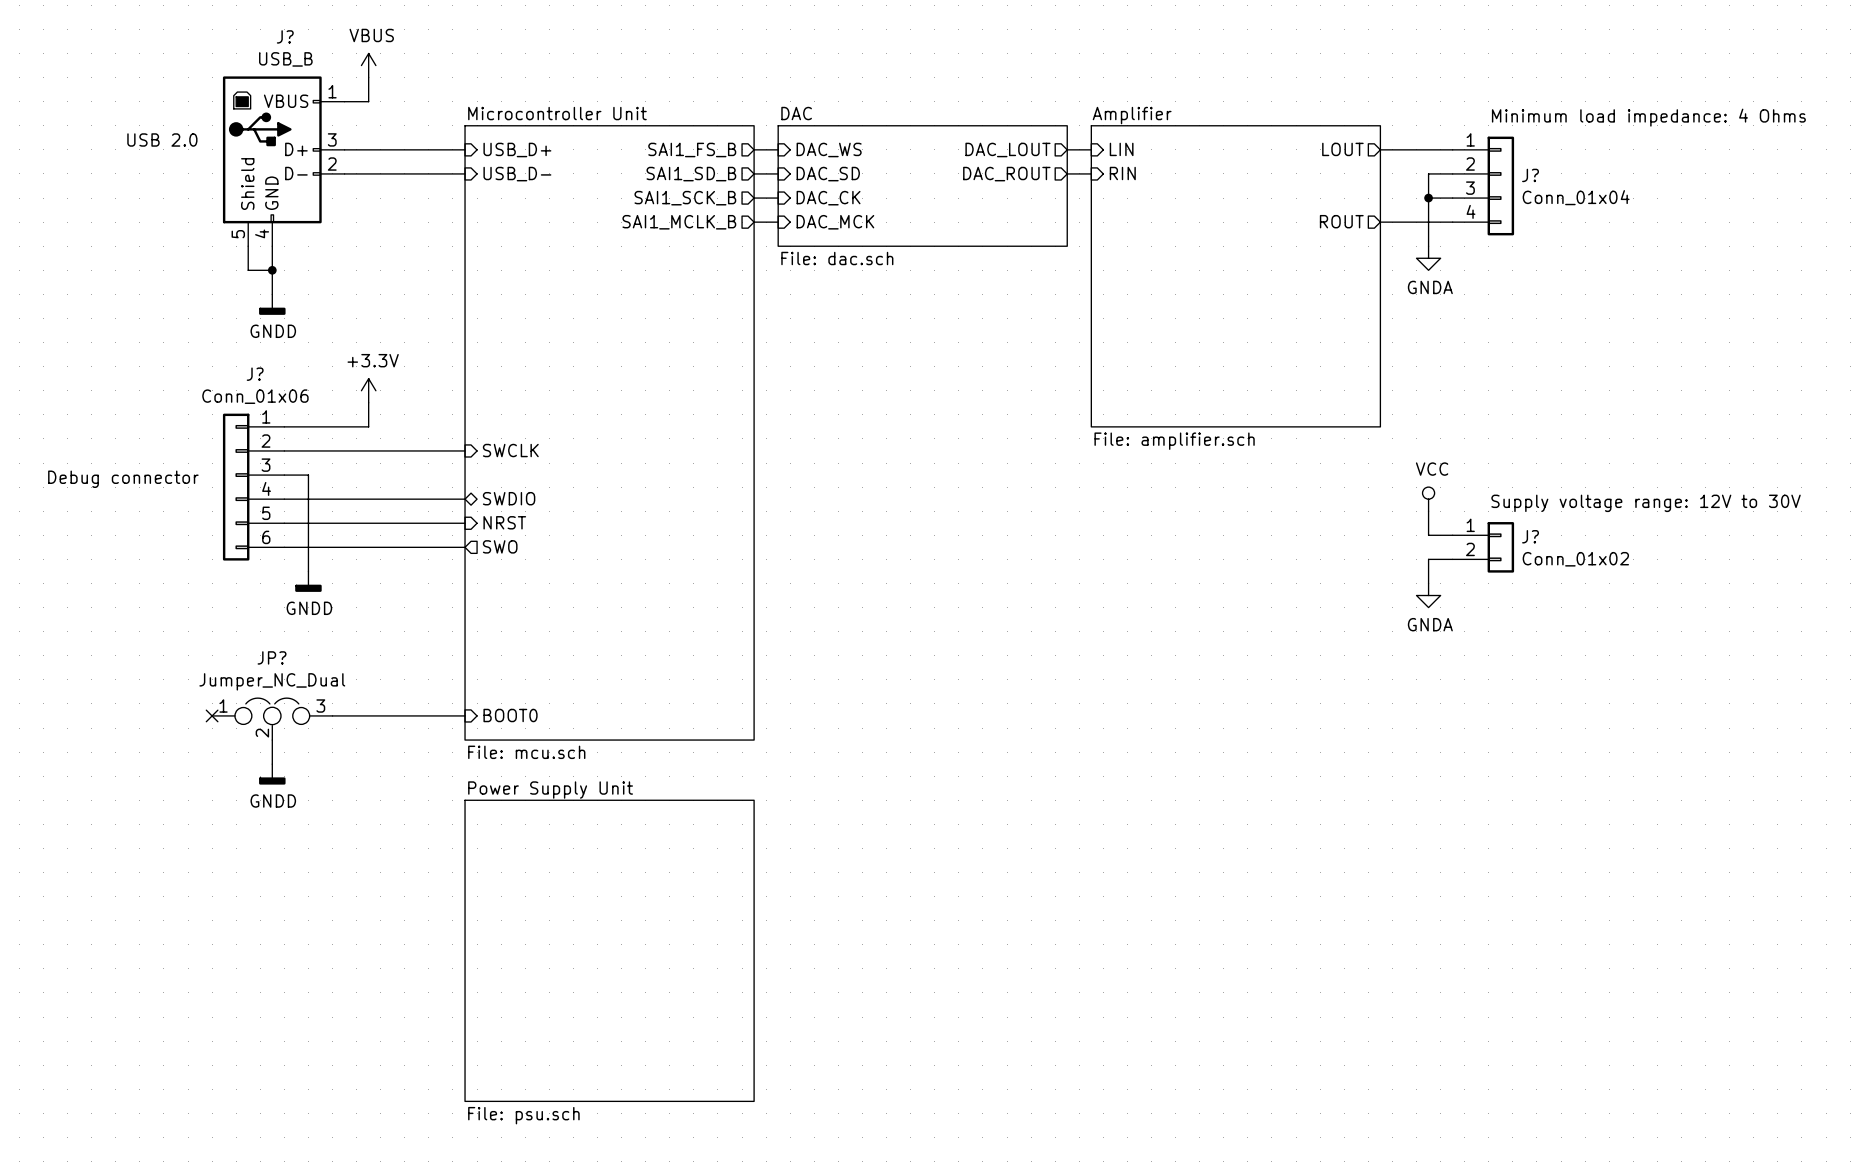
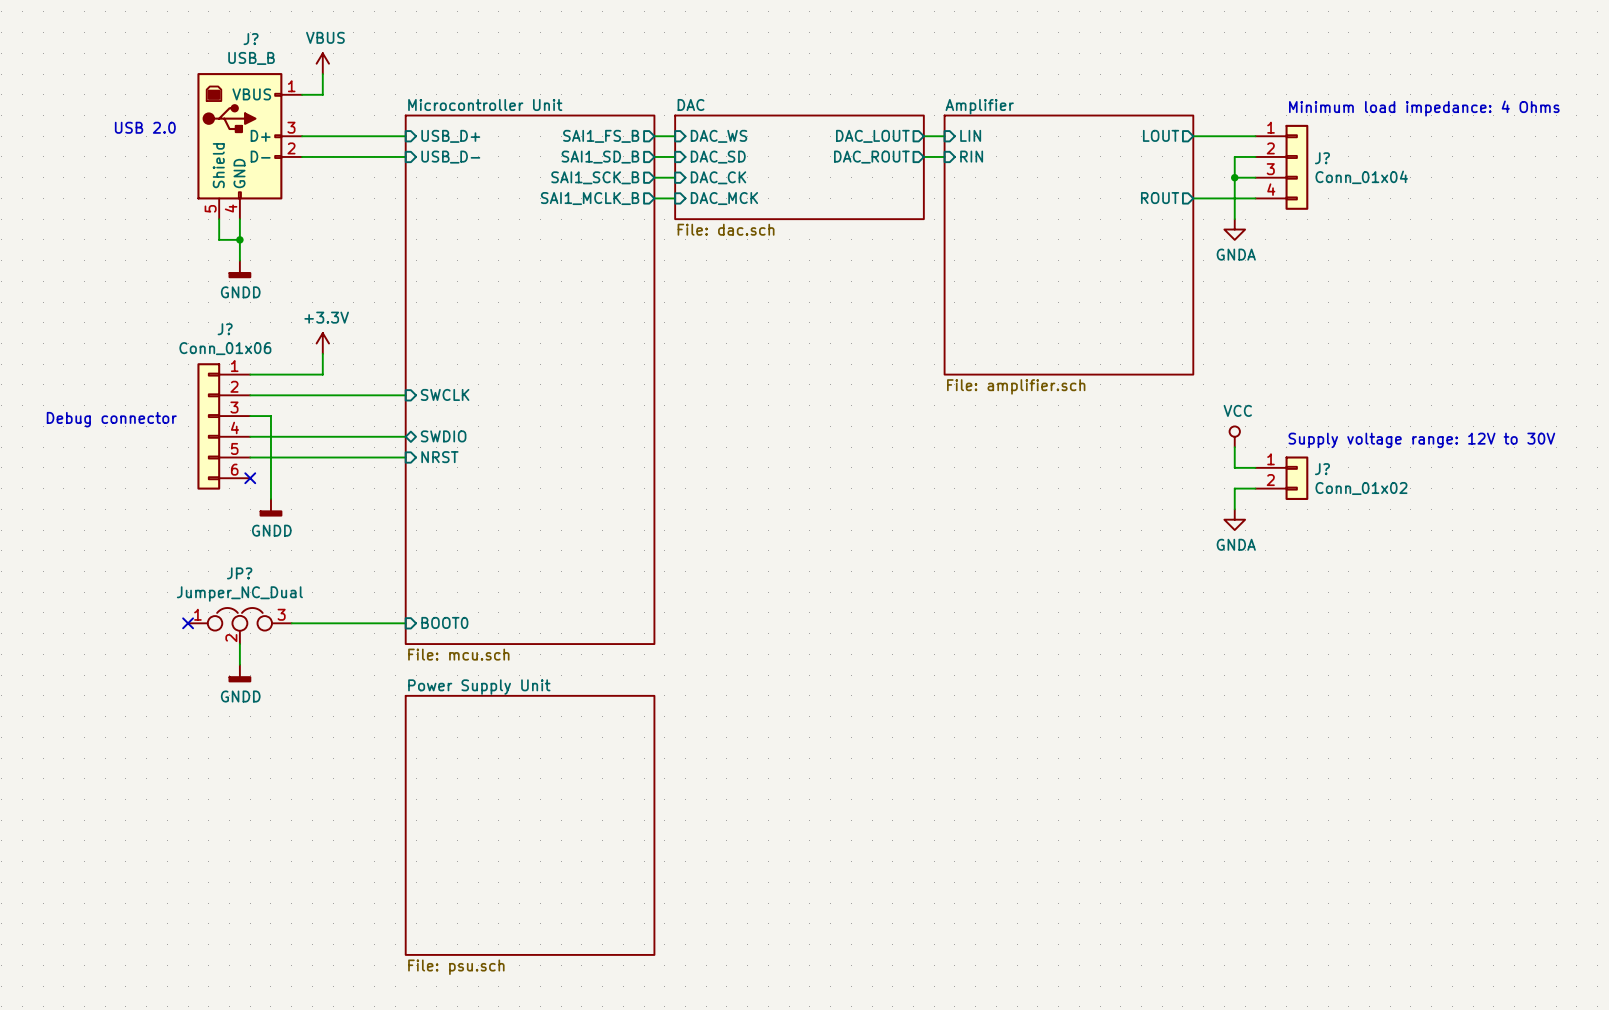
sheet pin: SWO (500, 546) -> none
wire: (284, 547) (465, 547) -> none
no-connect mark: none -> (250, 478)

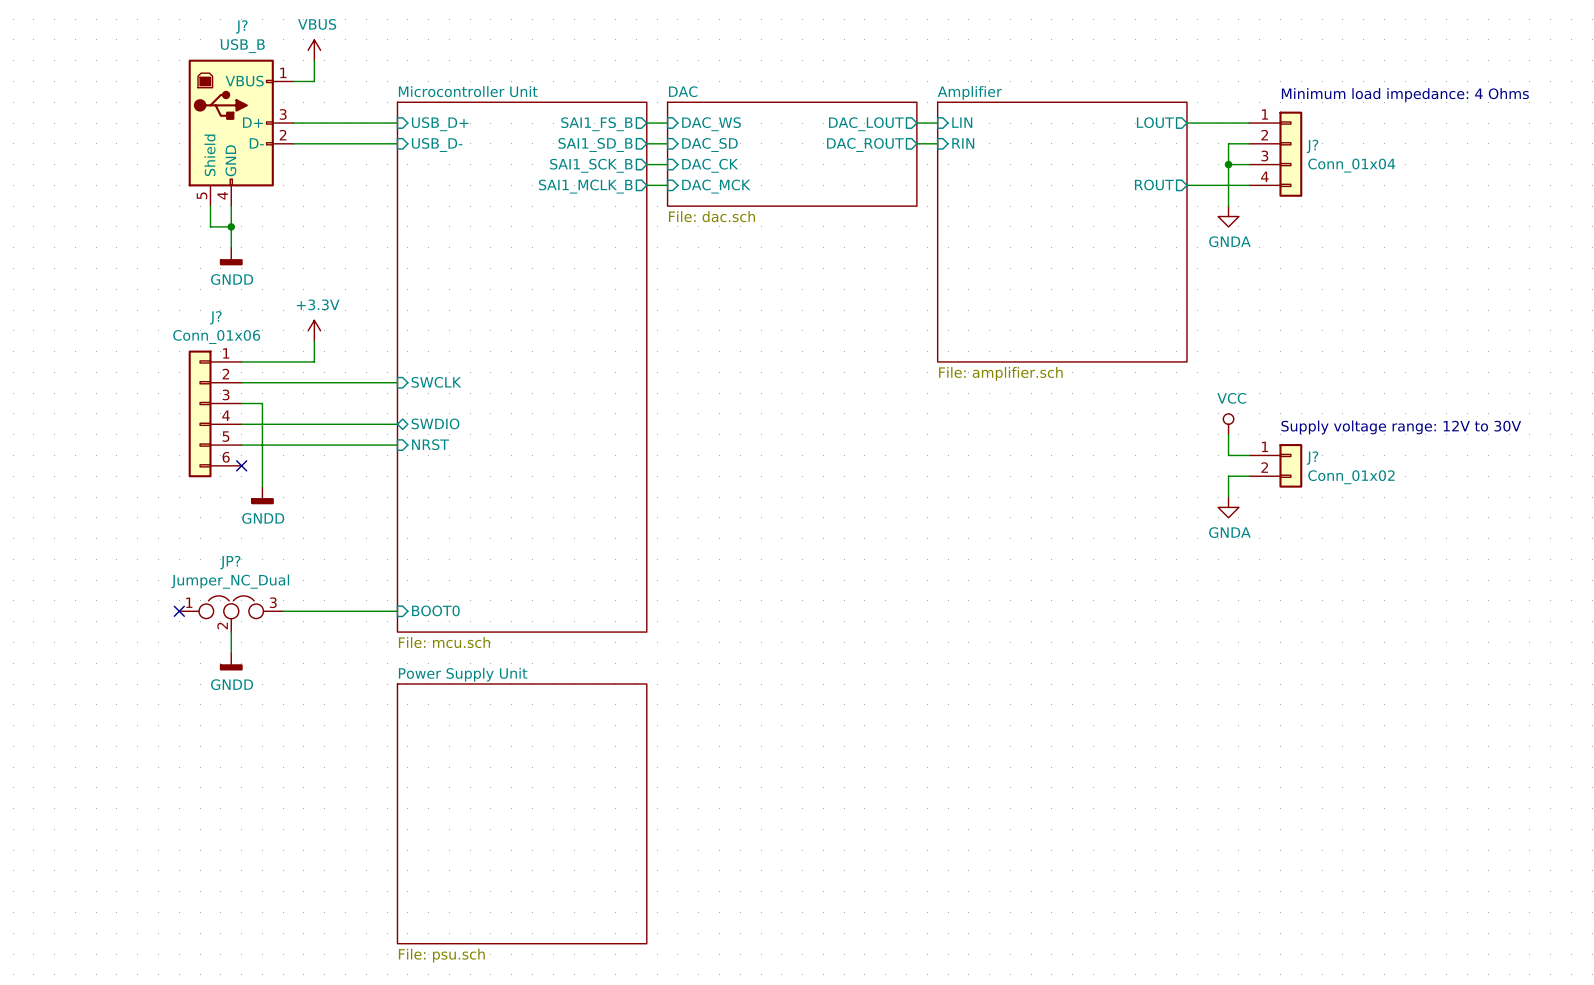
text: USB 2.0 (145, 127) -> none
text: Debug connector (111, 419) -> none

